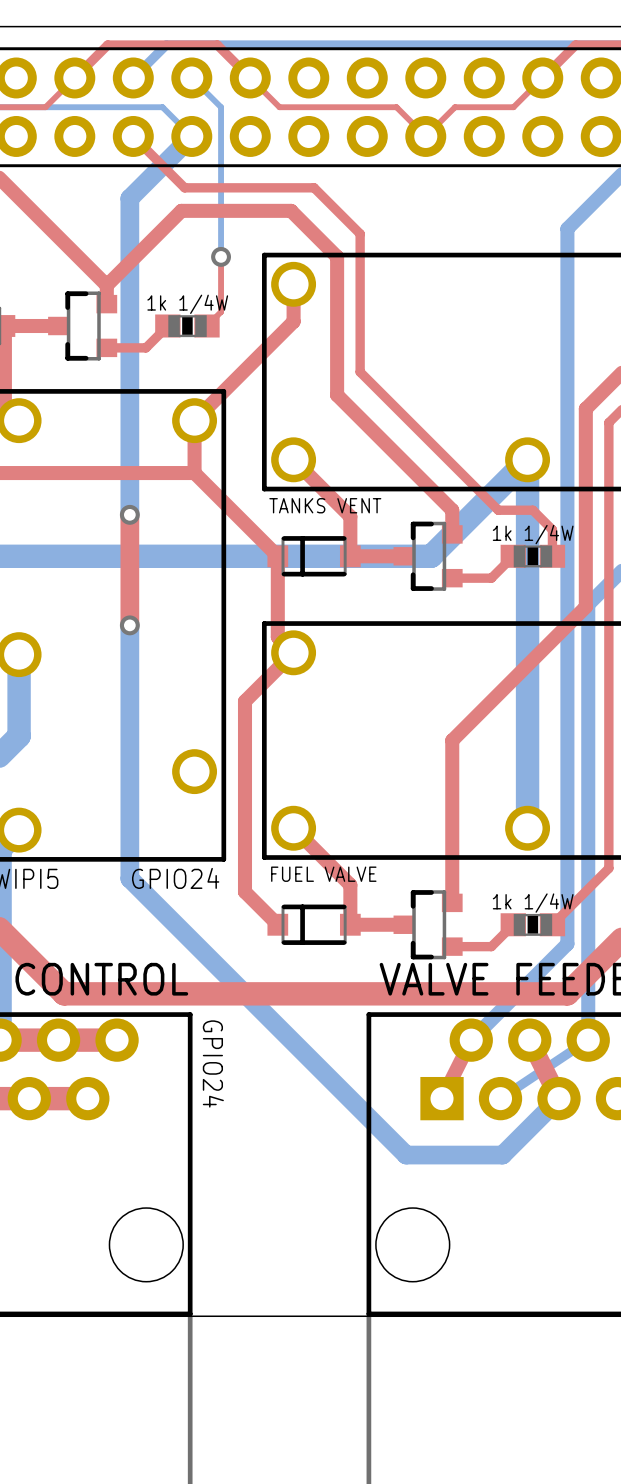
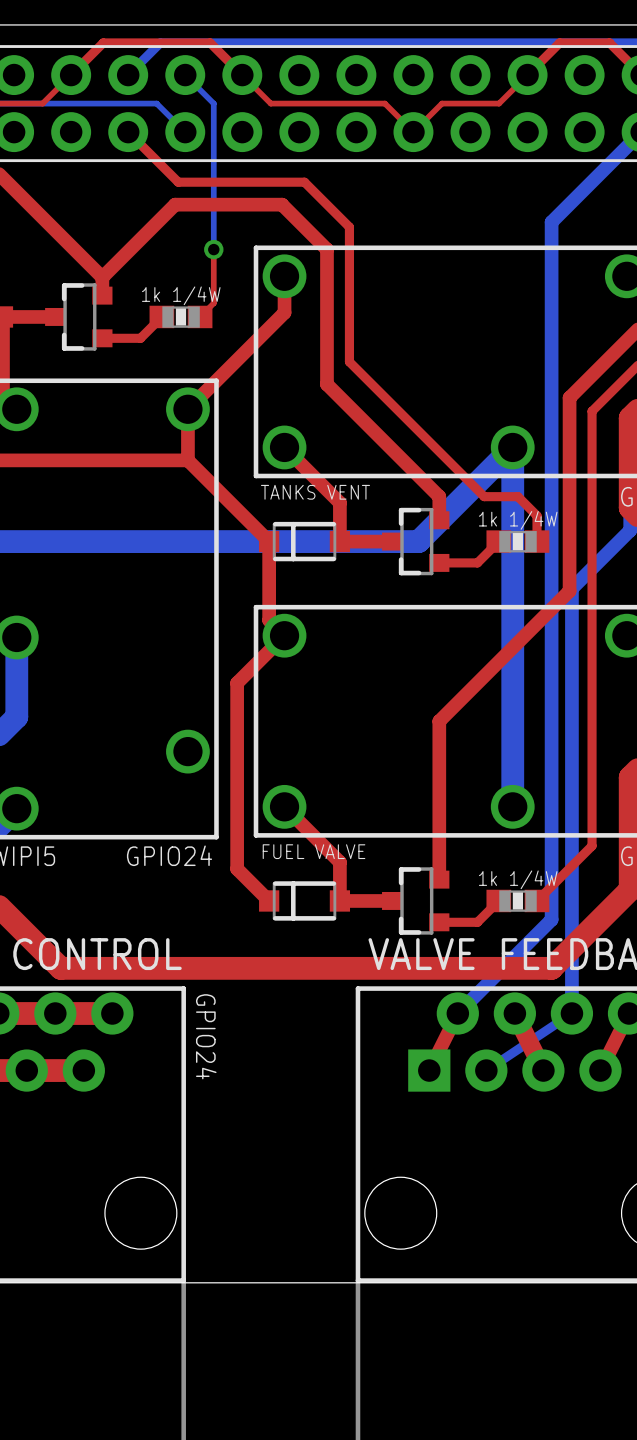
bottom track: (191, 136) (129, 198) (129, 514) -> none
top track: (129, 514) (129, 625) -> none
via: (129, 514) -> none
bottom track: (129, 625) (129, 878) (406, 1155) (502, 1155) (559, 1098) -> none
via: (129, 625) -> none

